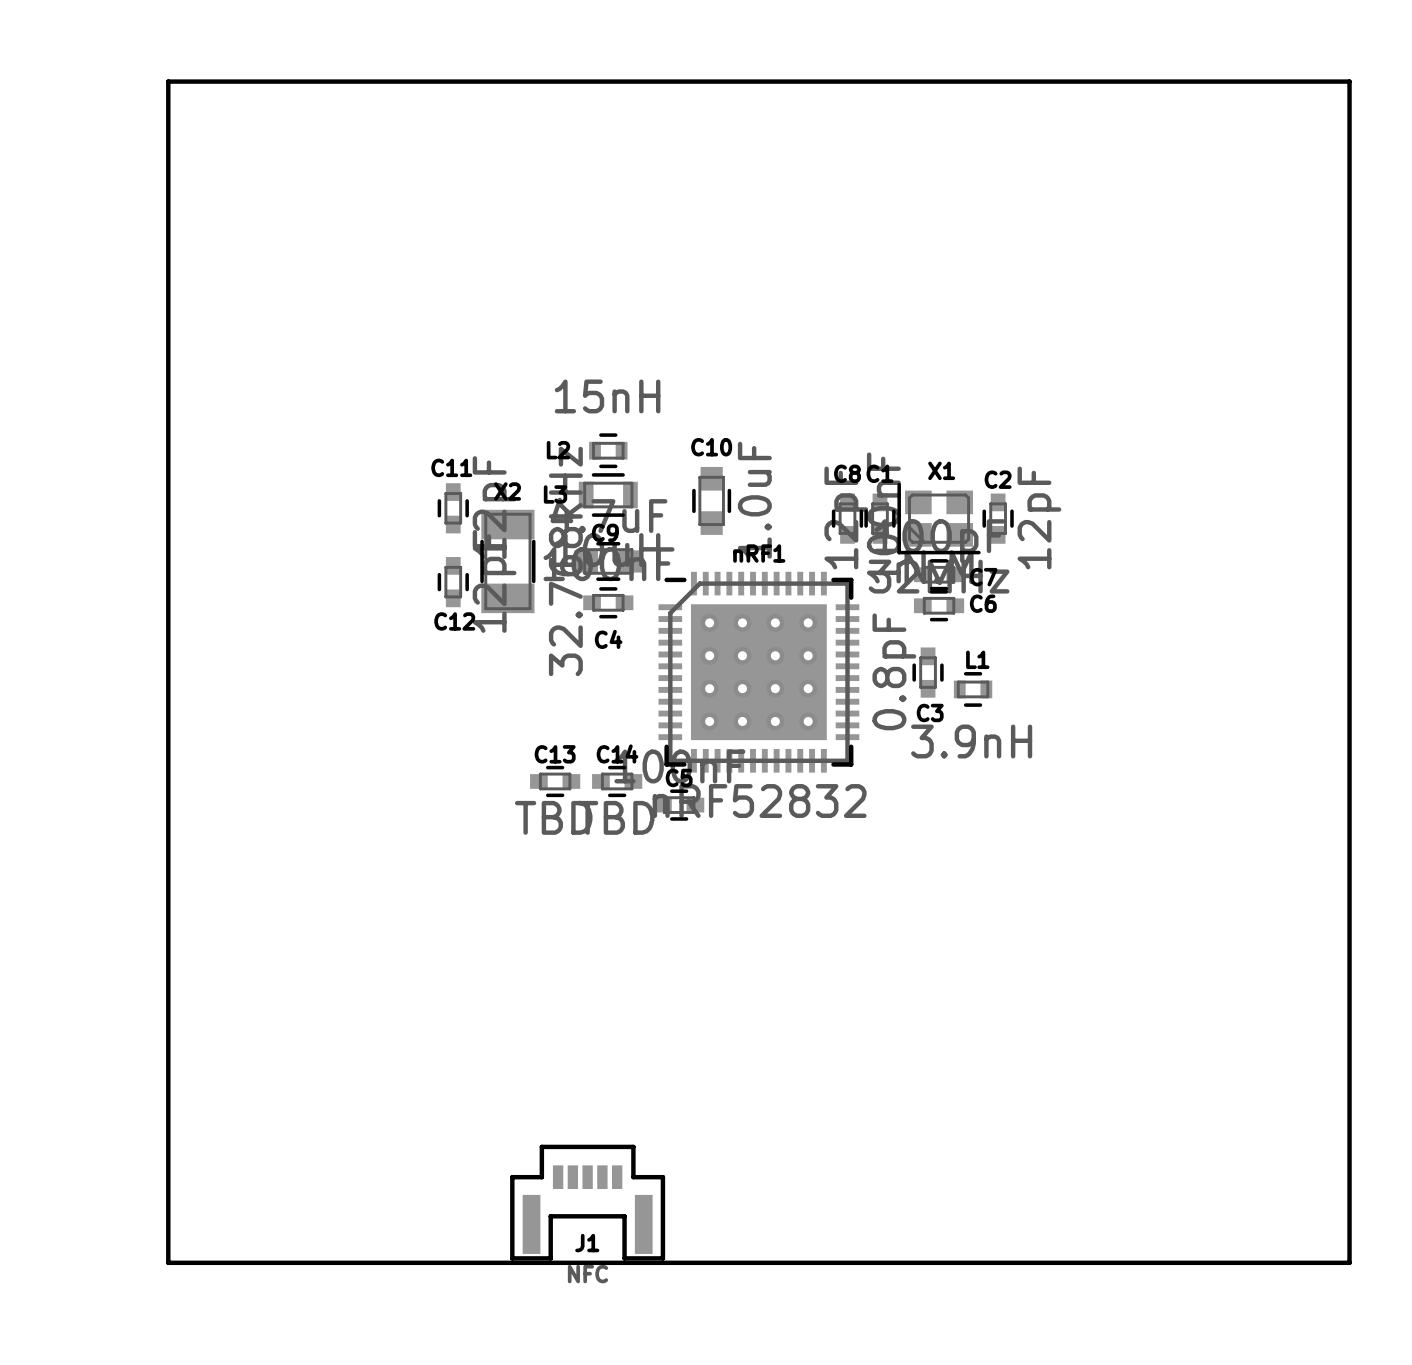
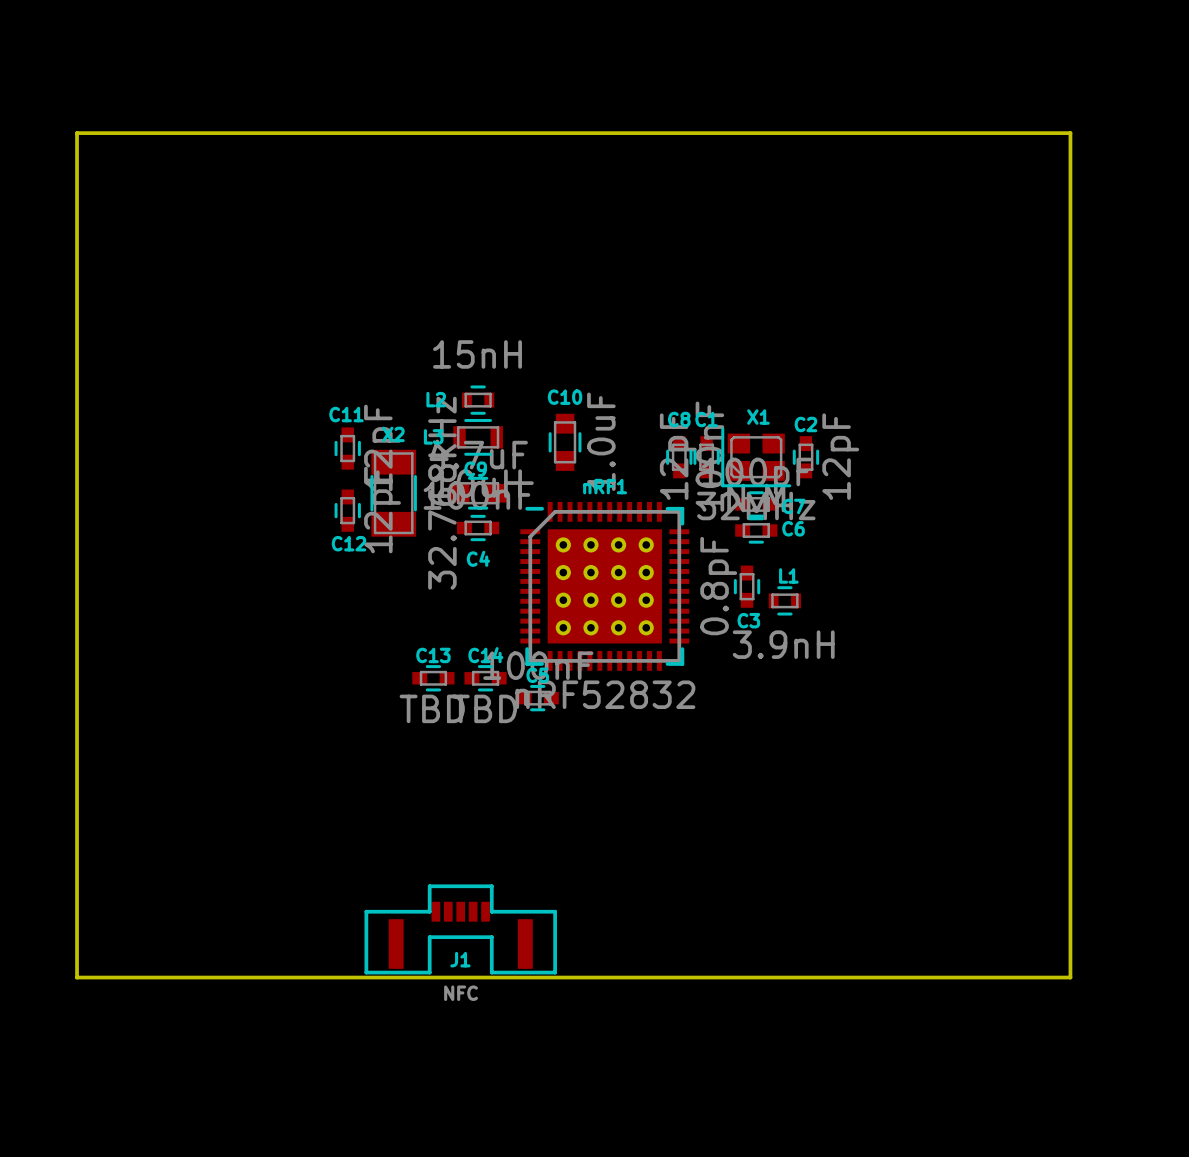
board edge: (168, 81) (168, 1262) (1349, 1262) (1349, 81) (168, 81) -> (77, 133) (77, 977) (1070, 977) (1070, 133) (77, 133)
J1 footprint: [510, 1144, 666, 1261] -> [364, 884, 557, 975]

